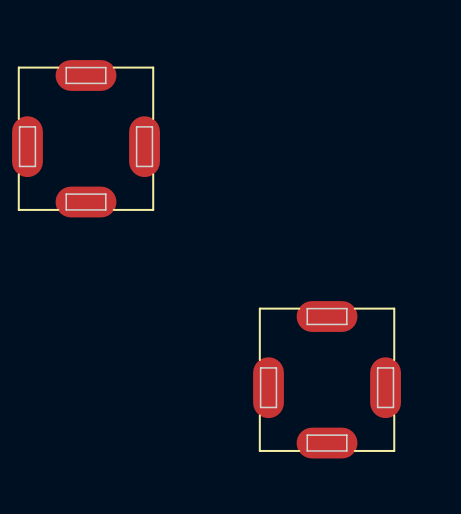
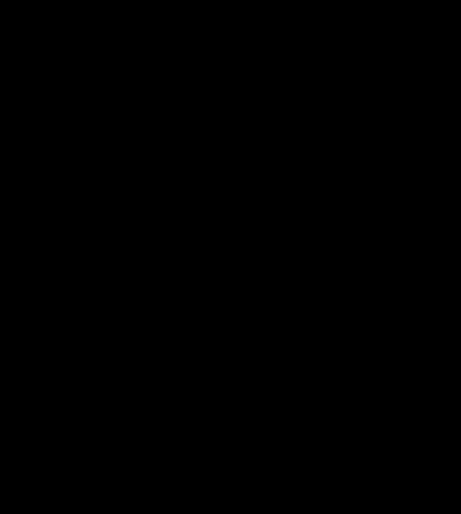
part: (86, 138) -> none
part: (327, 379) -> none

